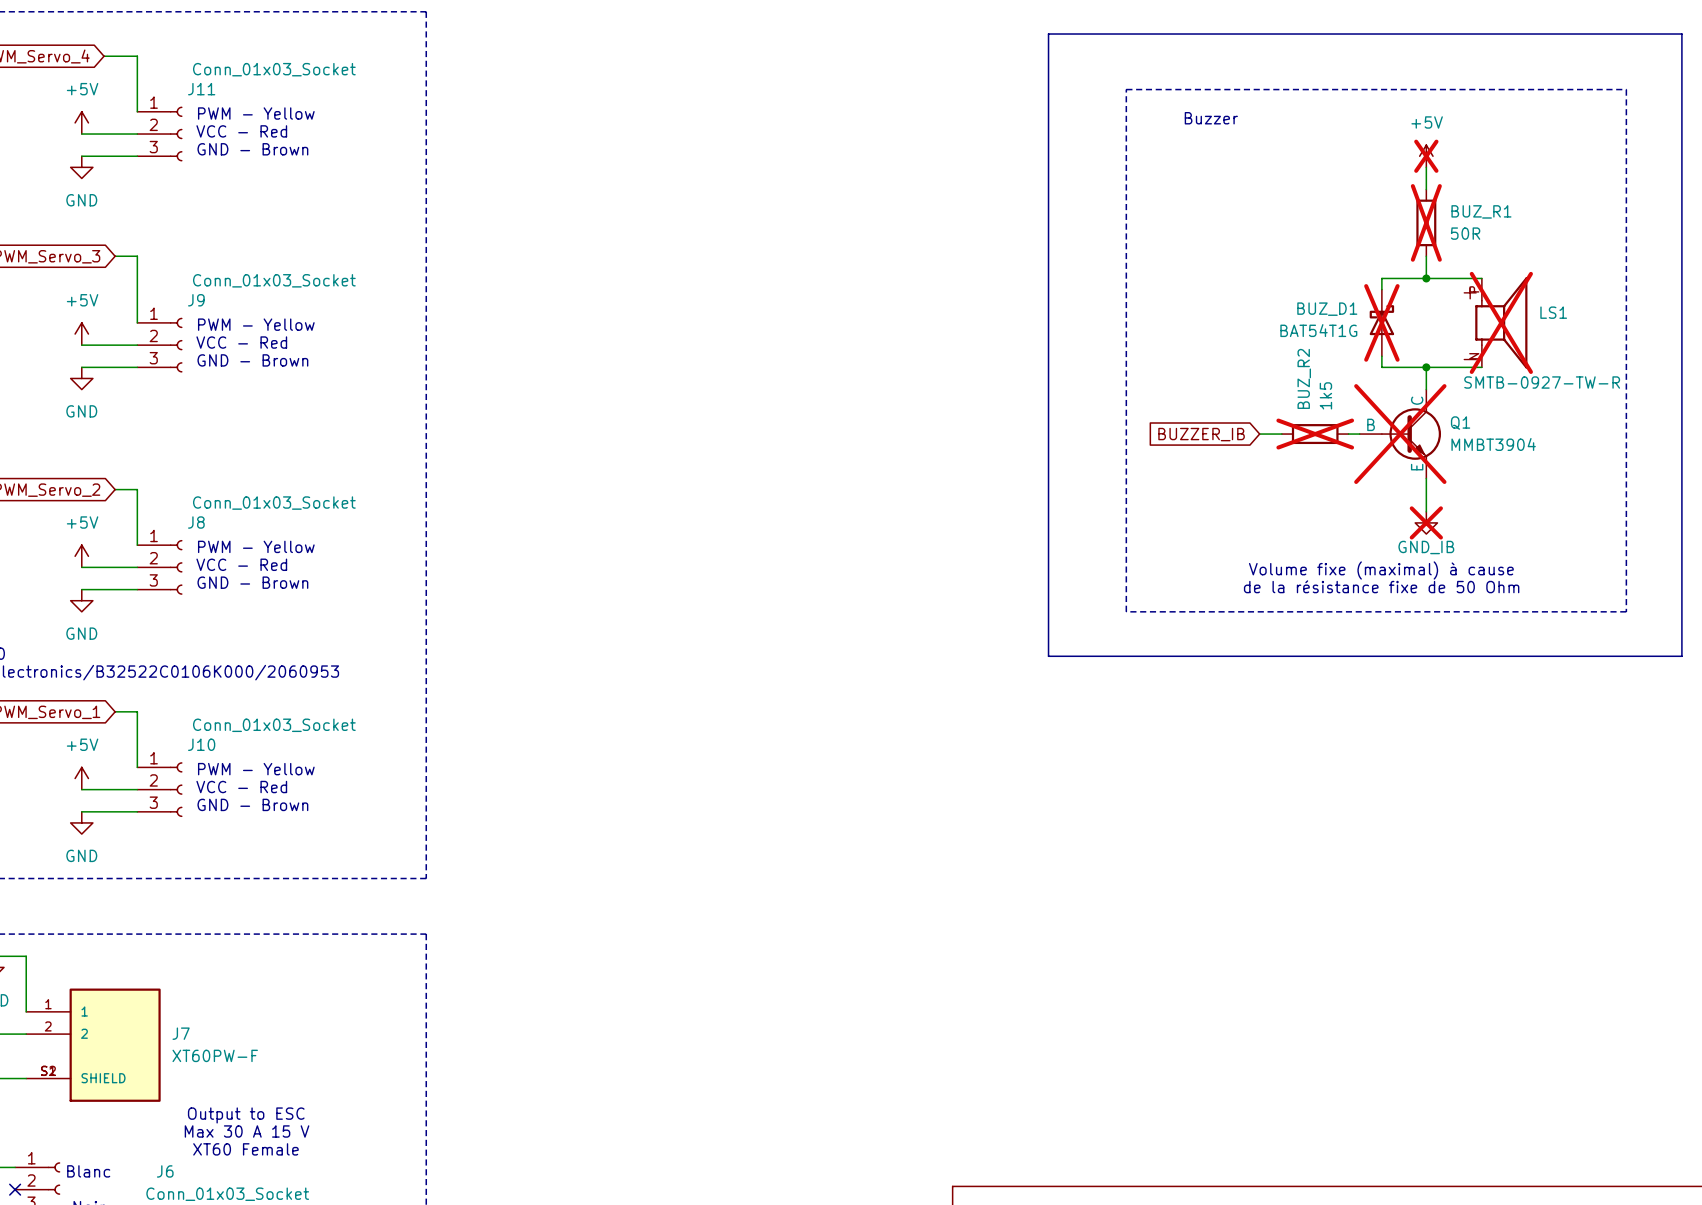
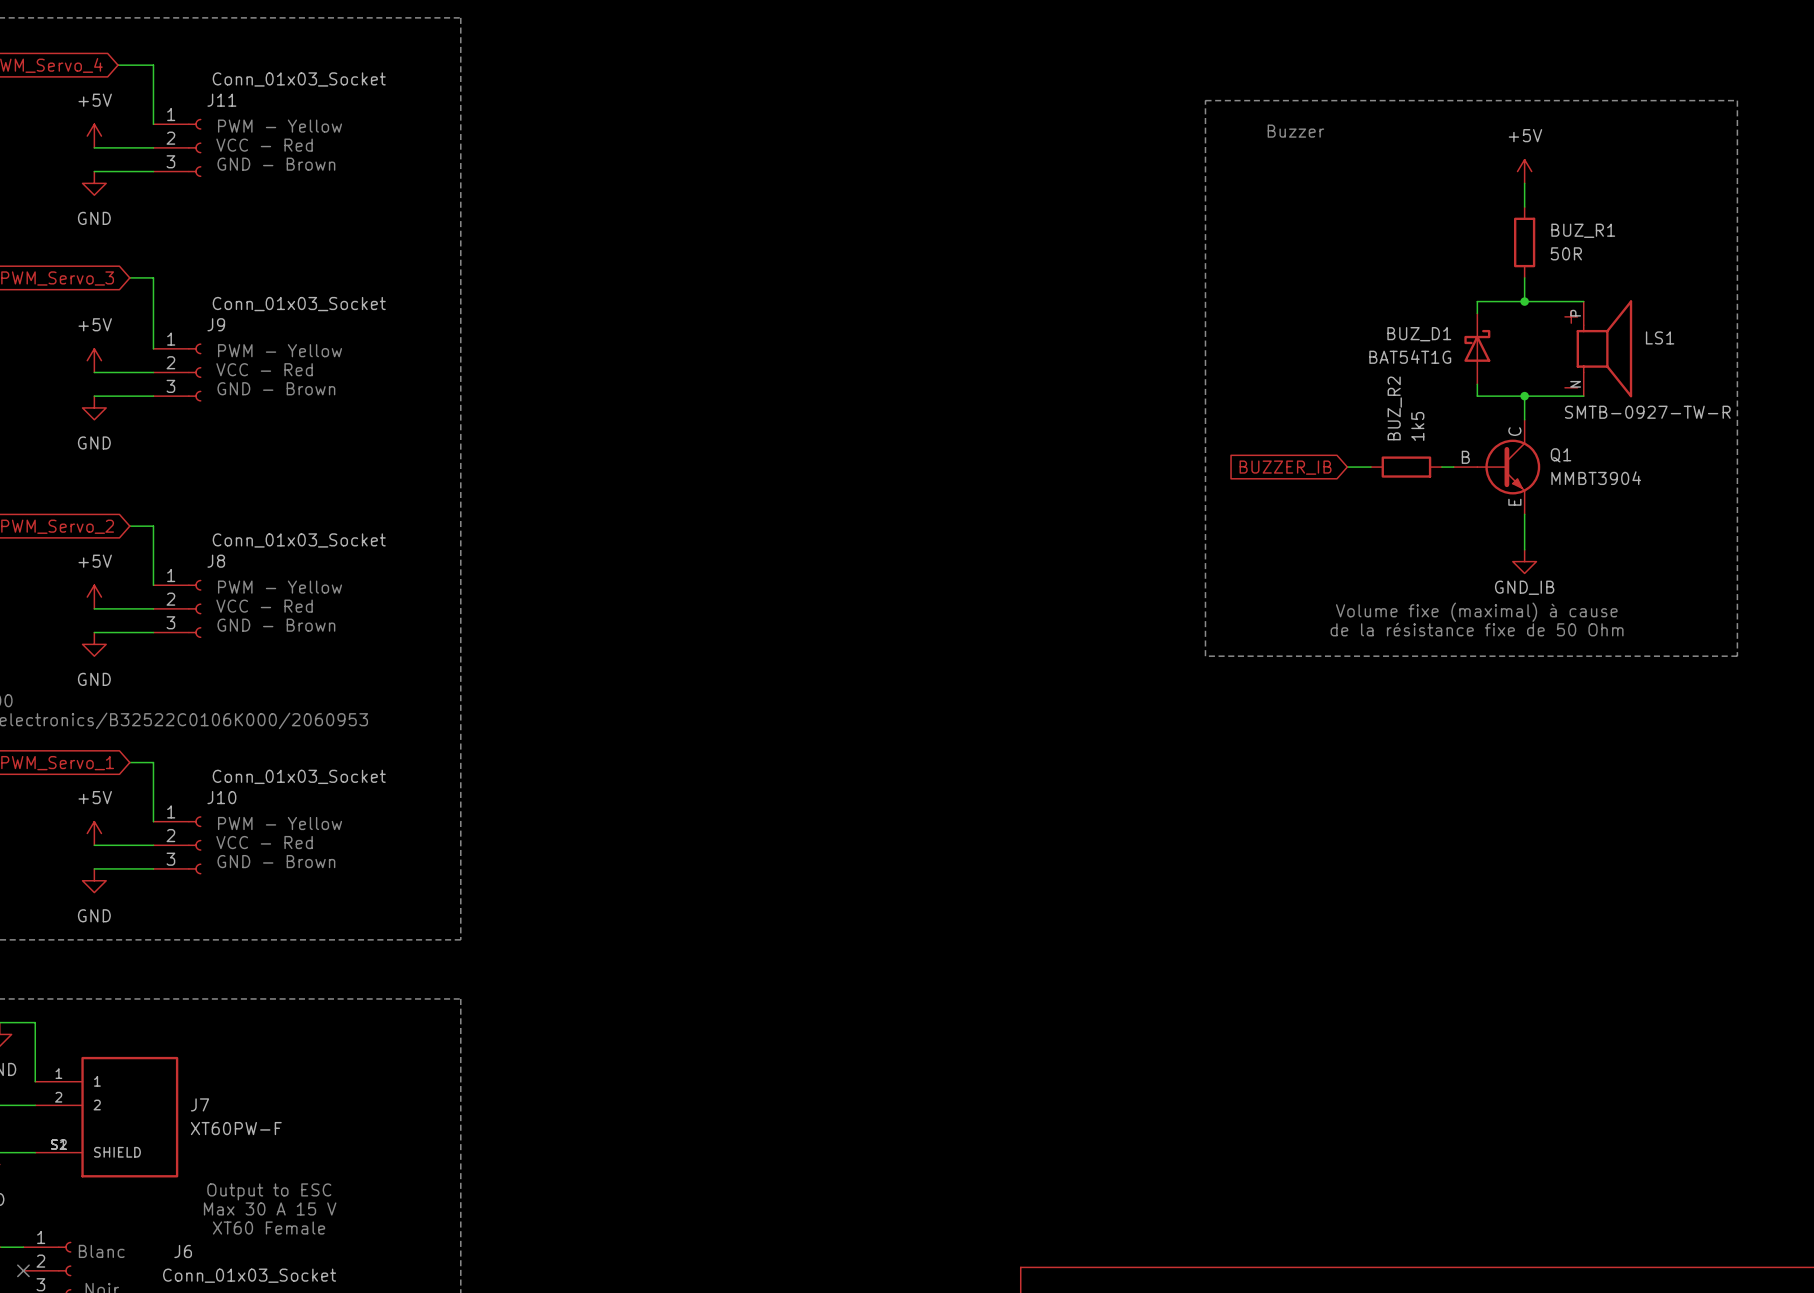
line: (1048, 34) (1681, 34) (1681, 656) (1048, 656) (1048, 34) -> none
power symbol do-not-place cross: (1426, 156) -> none
BUZ_R1 do-not-place cross: (1426, 222) -> none
BUZ_D1 do-not-place cross: (1381, 322) -> none
LS1 do-not-place cross: (1501, 322) -> none
BUZ_R2 do-not-place cross: (1315, 434) -> none
Q1 do-not-place cross: (1400, 434) -> none
power symbol do-not-place cross: (1426, 522) -> none

